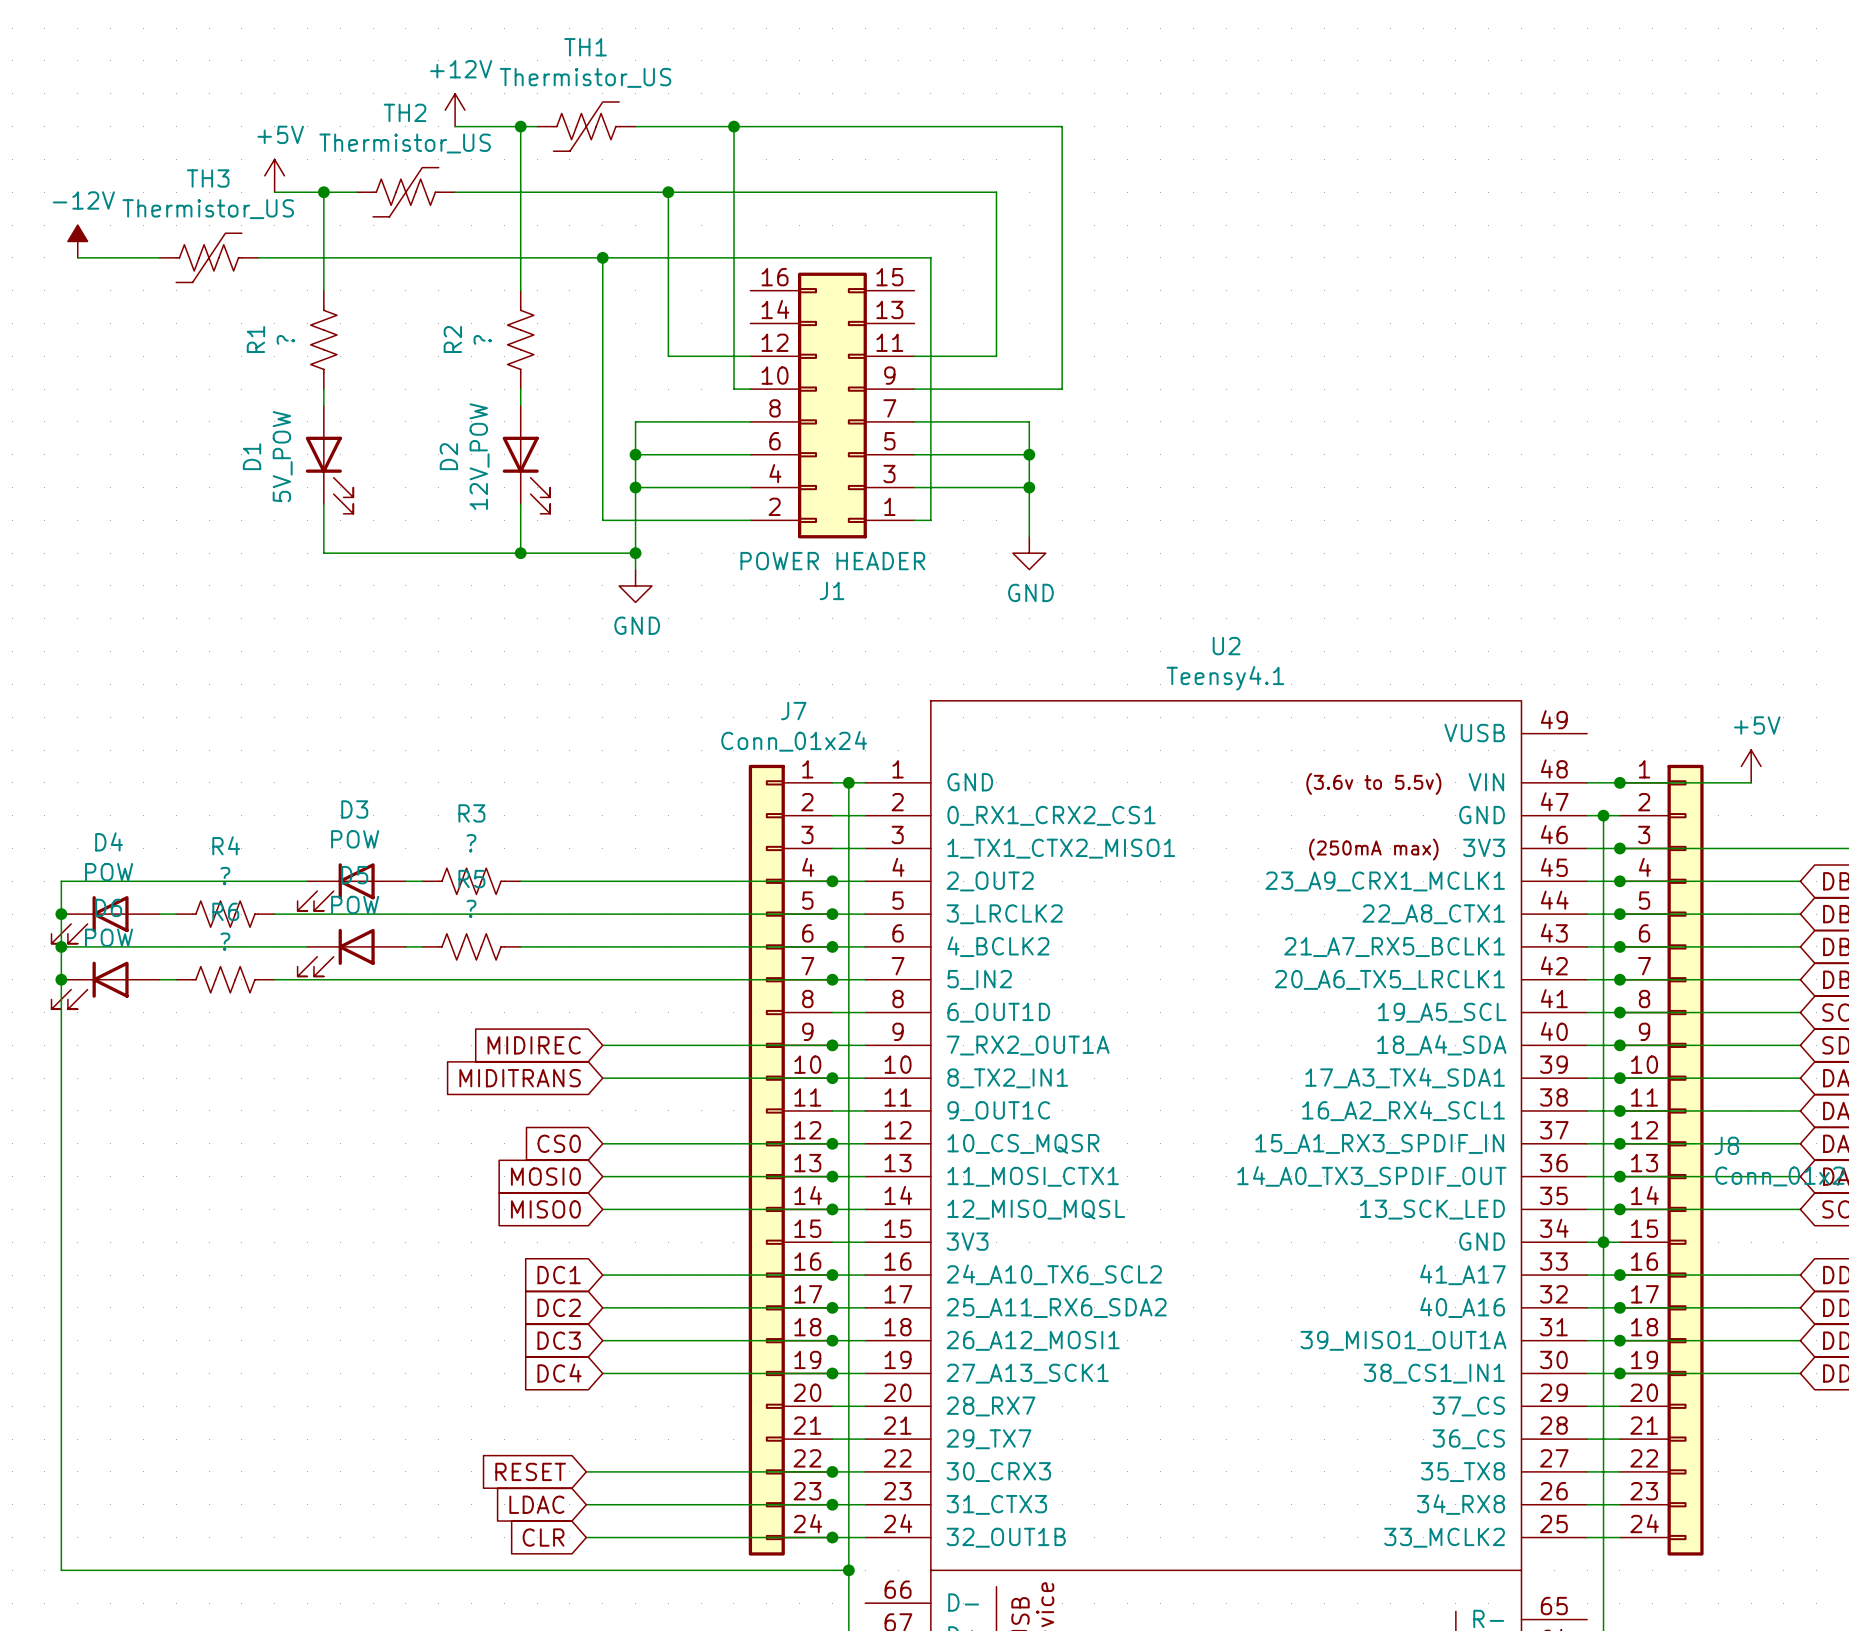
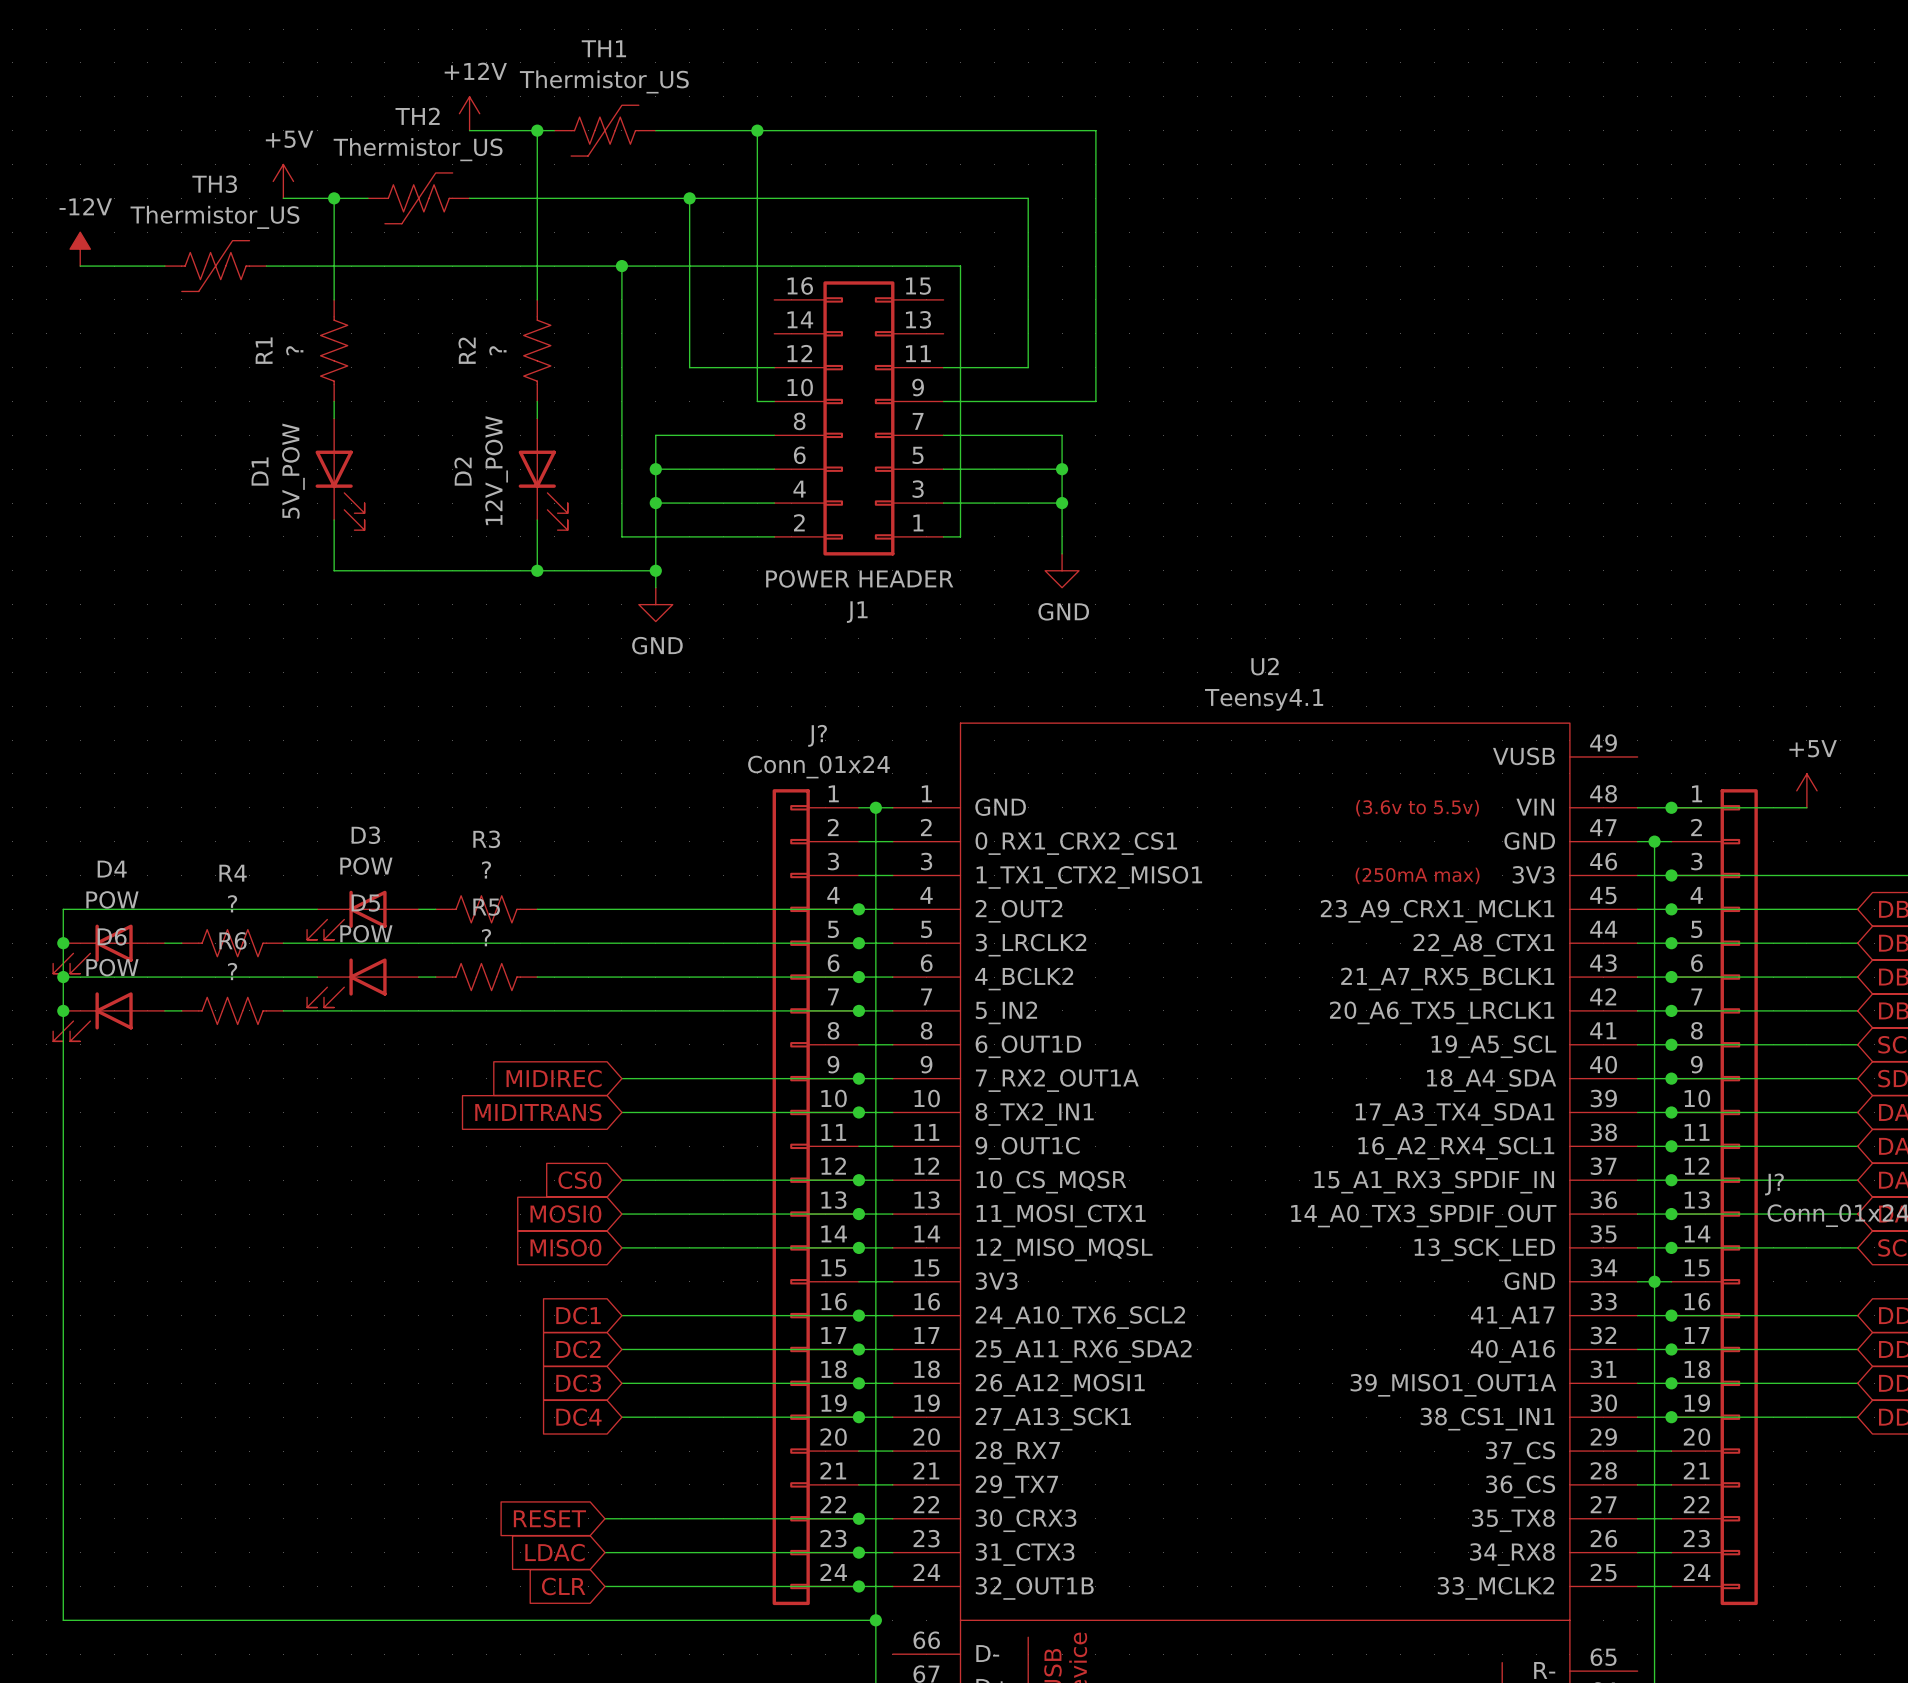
J7 name: J7 (793, 711) -> J? (817, 735)
J8 name: J8 (1726, 1145) -> J? (1774, 1184)

